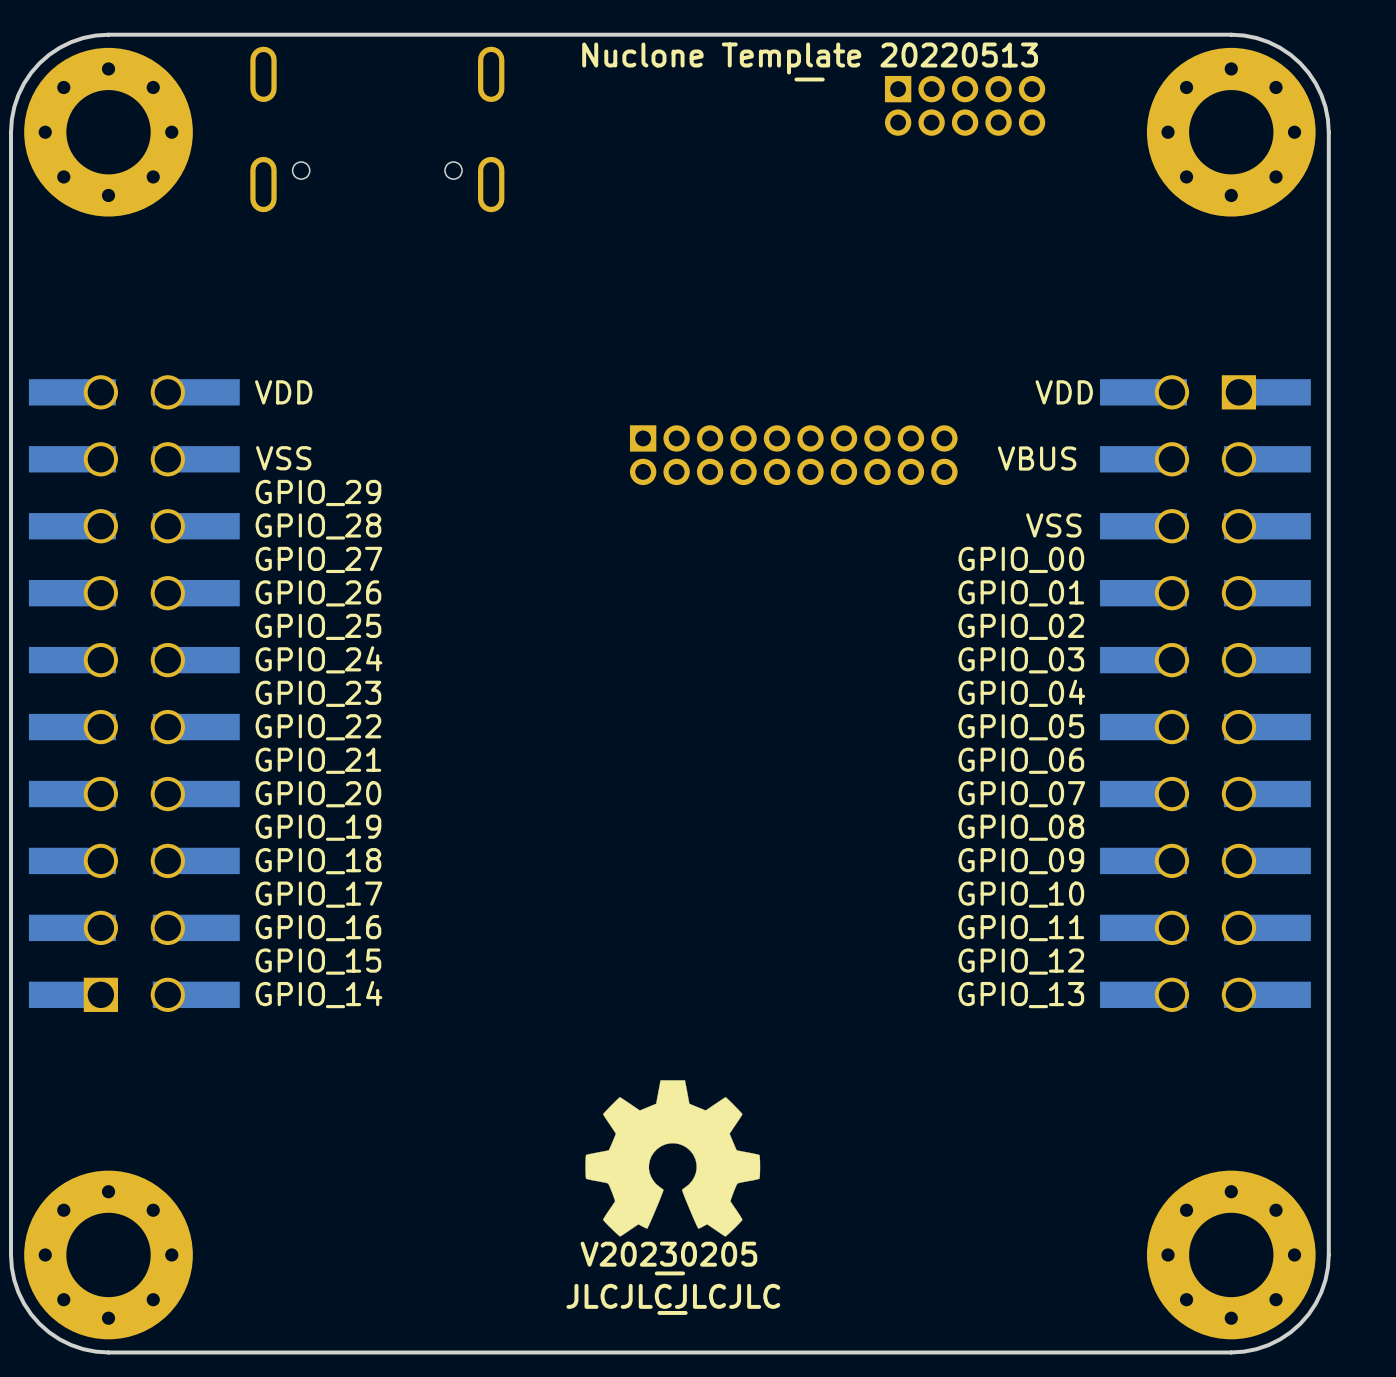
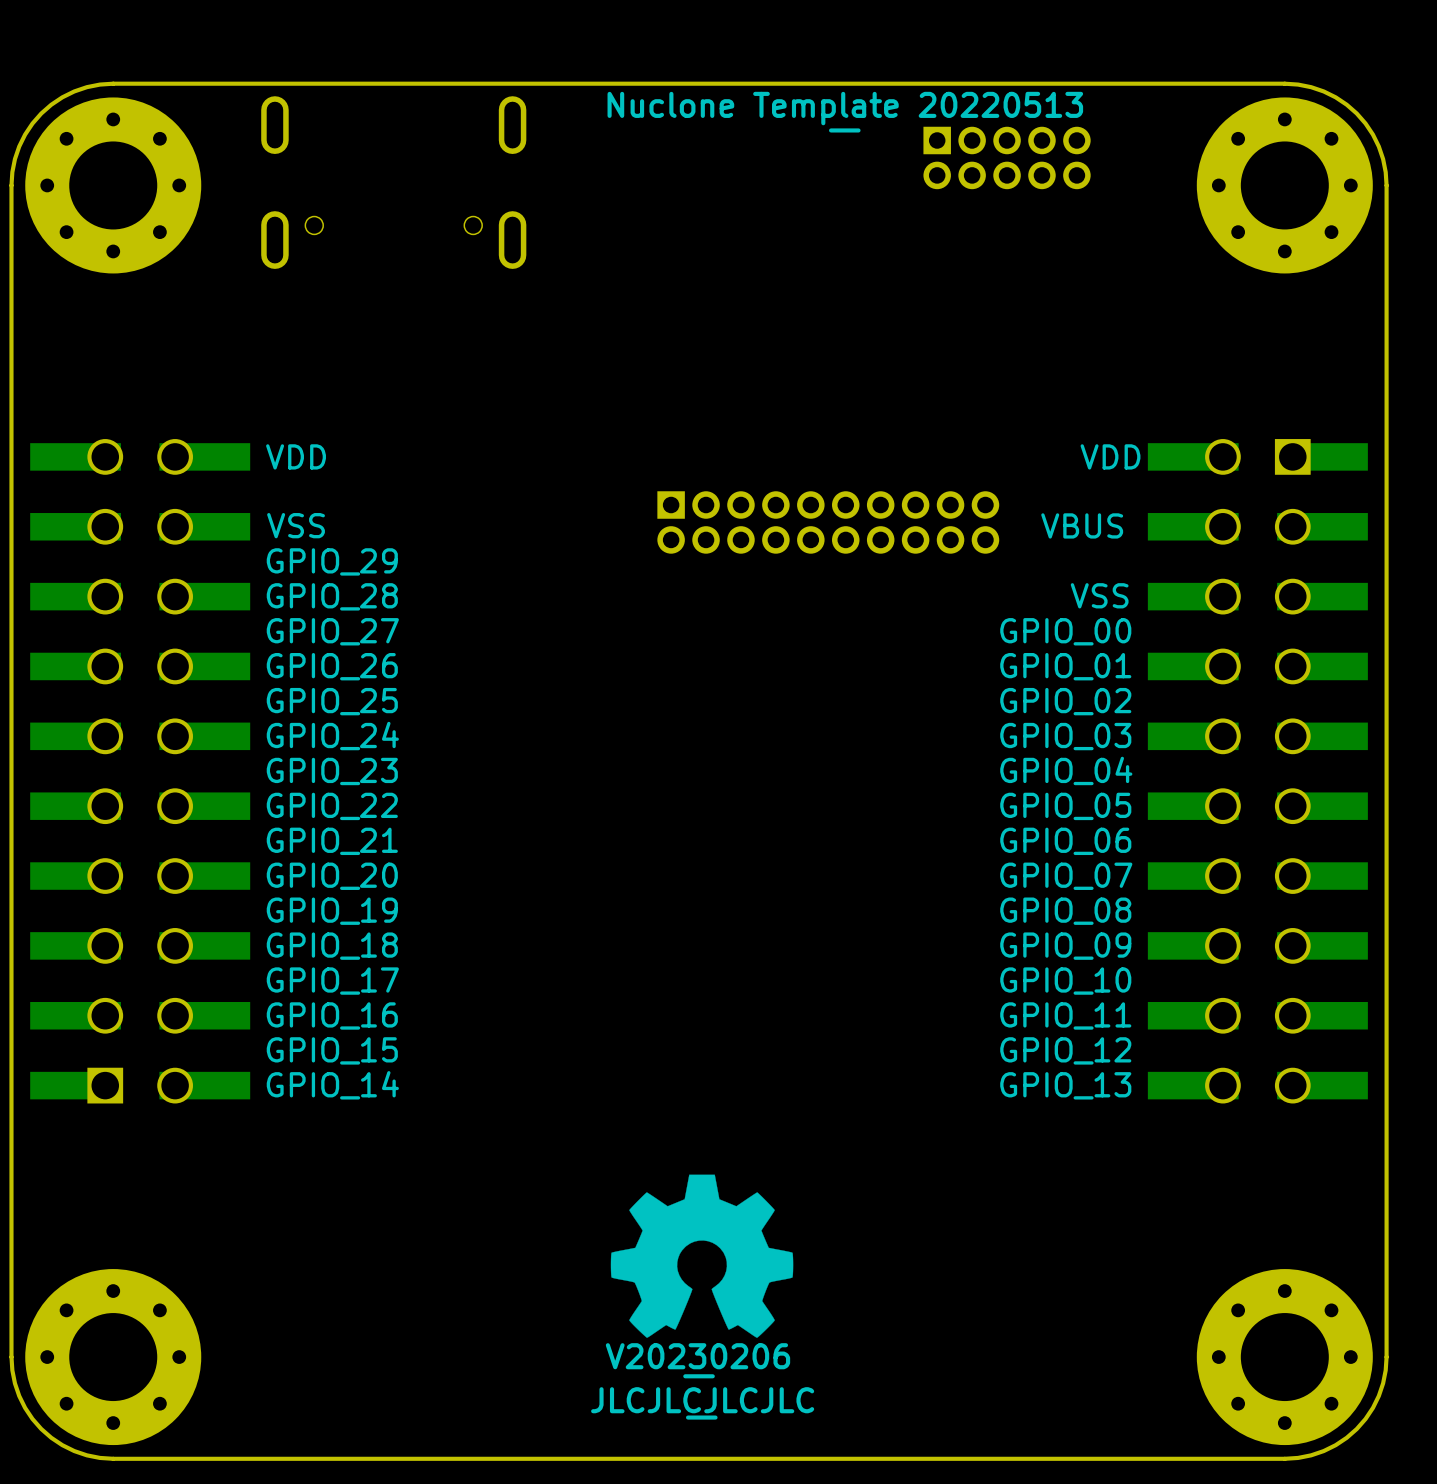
drawing shape: [580, 1241, 758, 1276] -> [605, 1343, 791, 1379]

